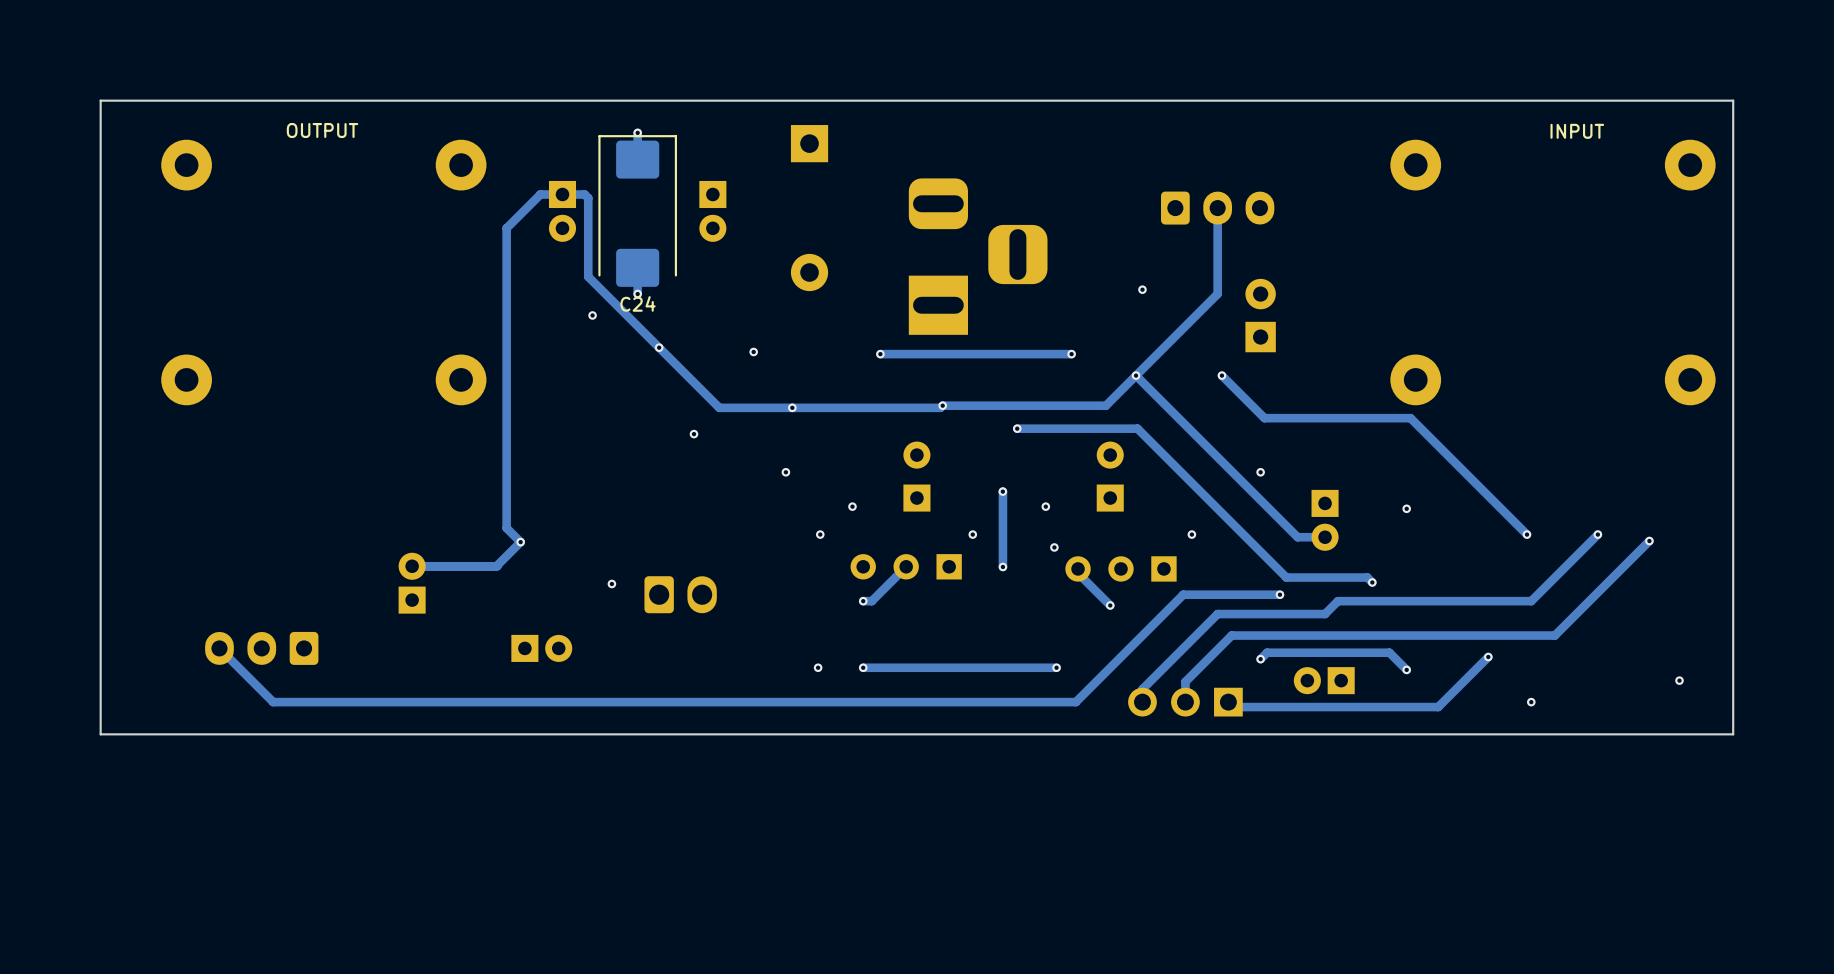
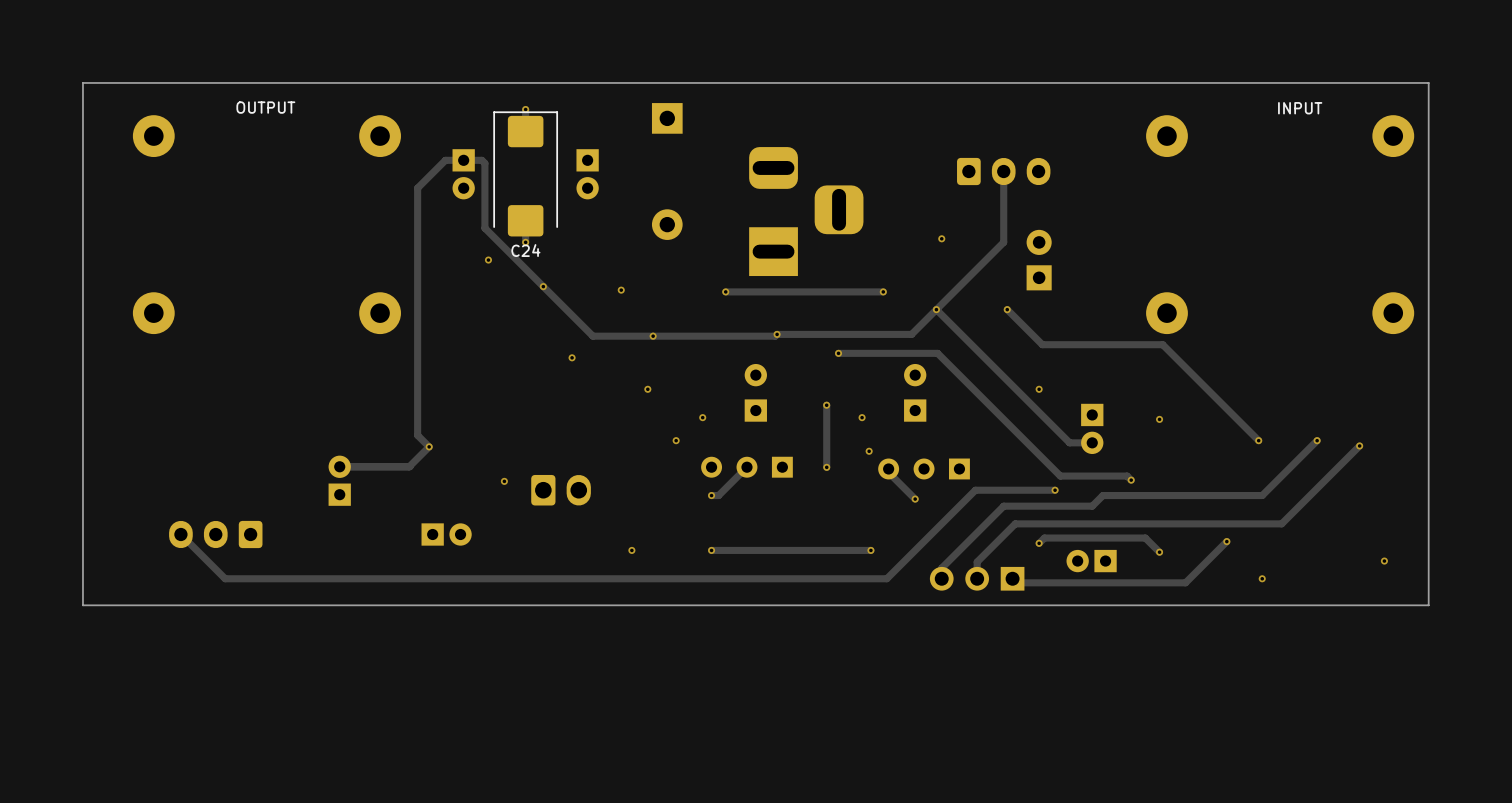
via: (972, 534) -> none
via: (1191, 534) -> none
via position: (818, 667) -> (631, 550)

